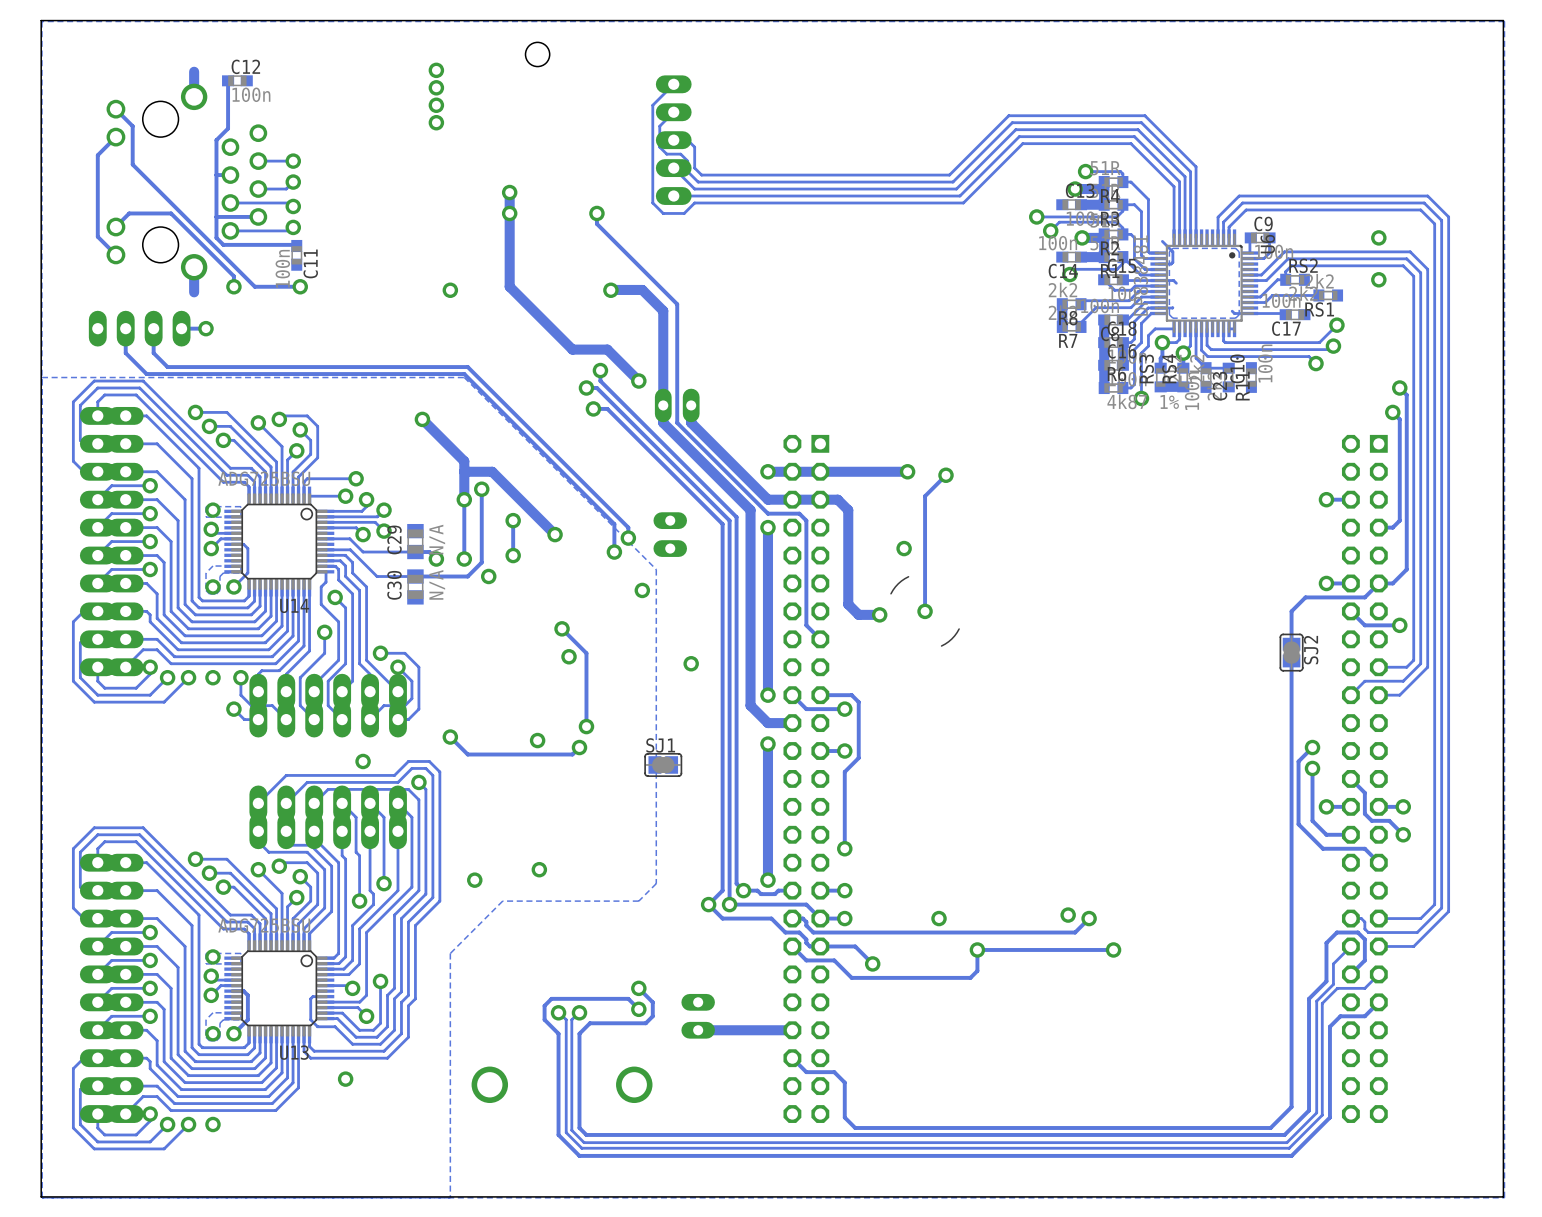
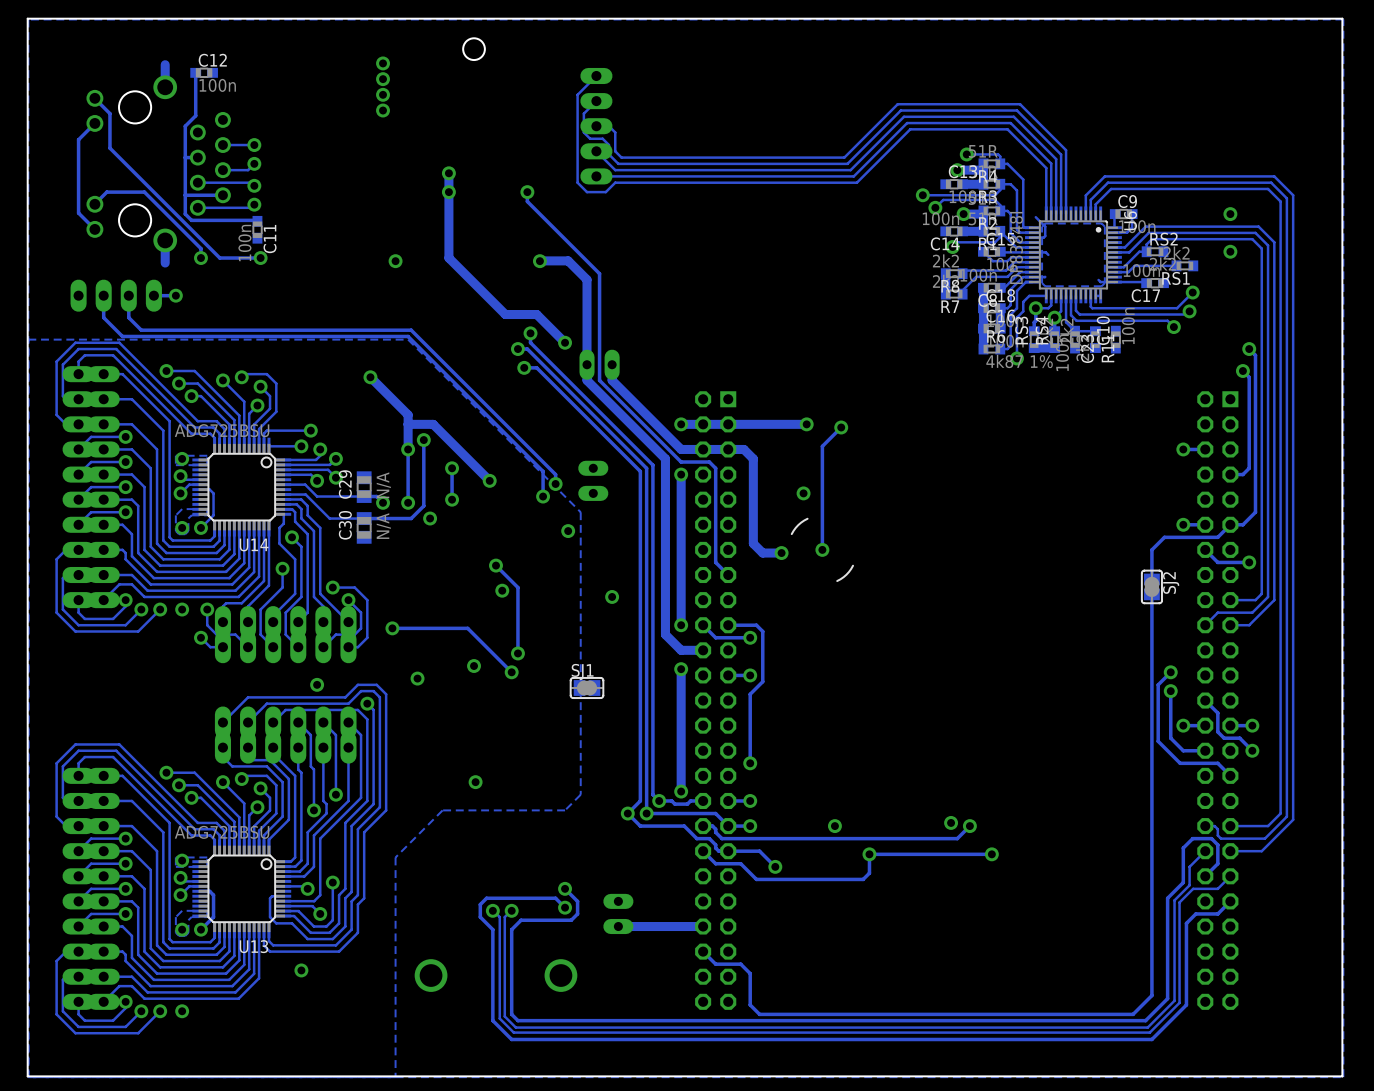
via: none -> (392, 628)
track: (450, 737) (467, 754) (572, 754) (579, 747) -> (392, 628) (467, 628) (511, 672)
via: (450, 737) -> none
via: none -> (417, 678)
via: (474, 880) -> none

